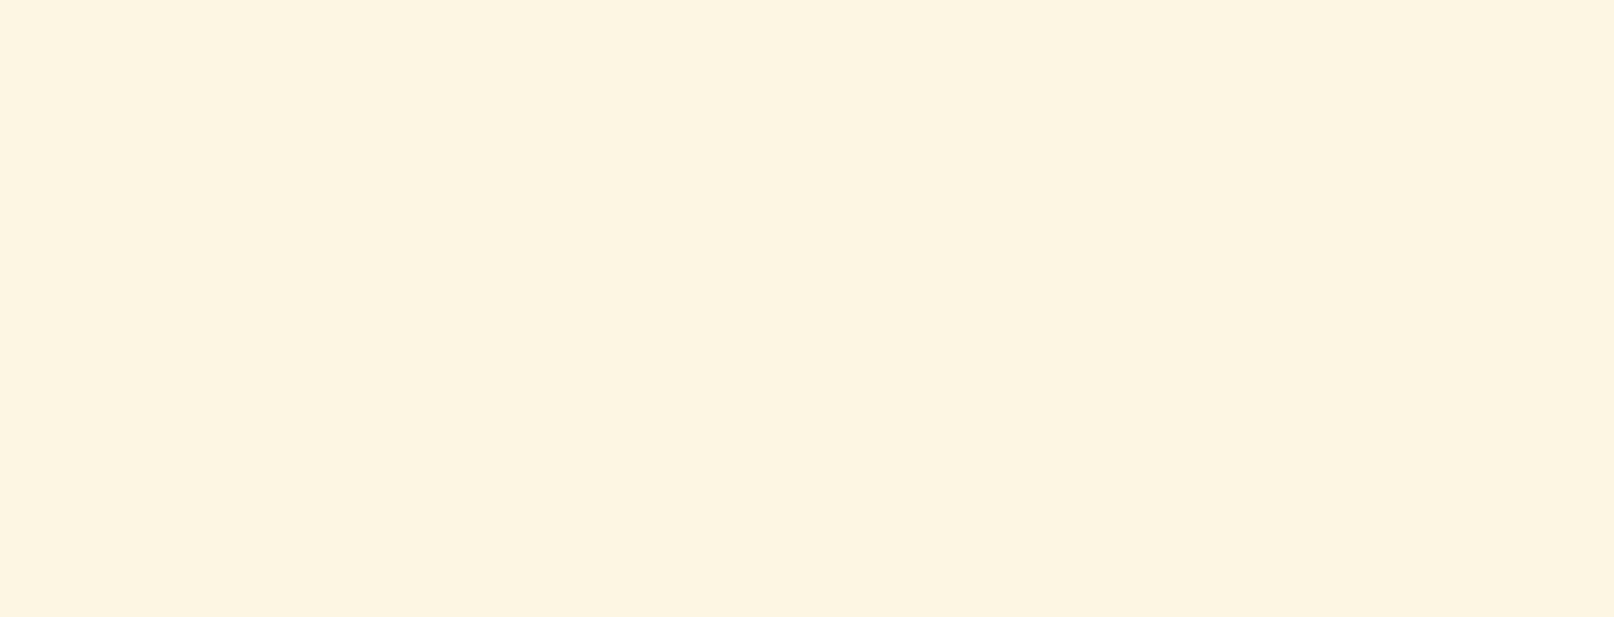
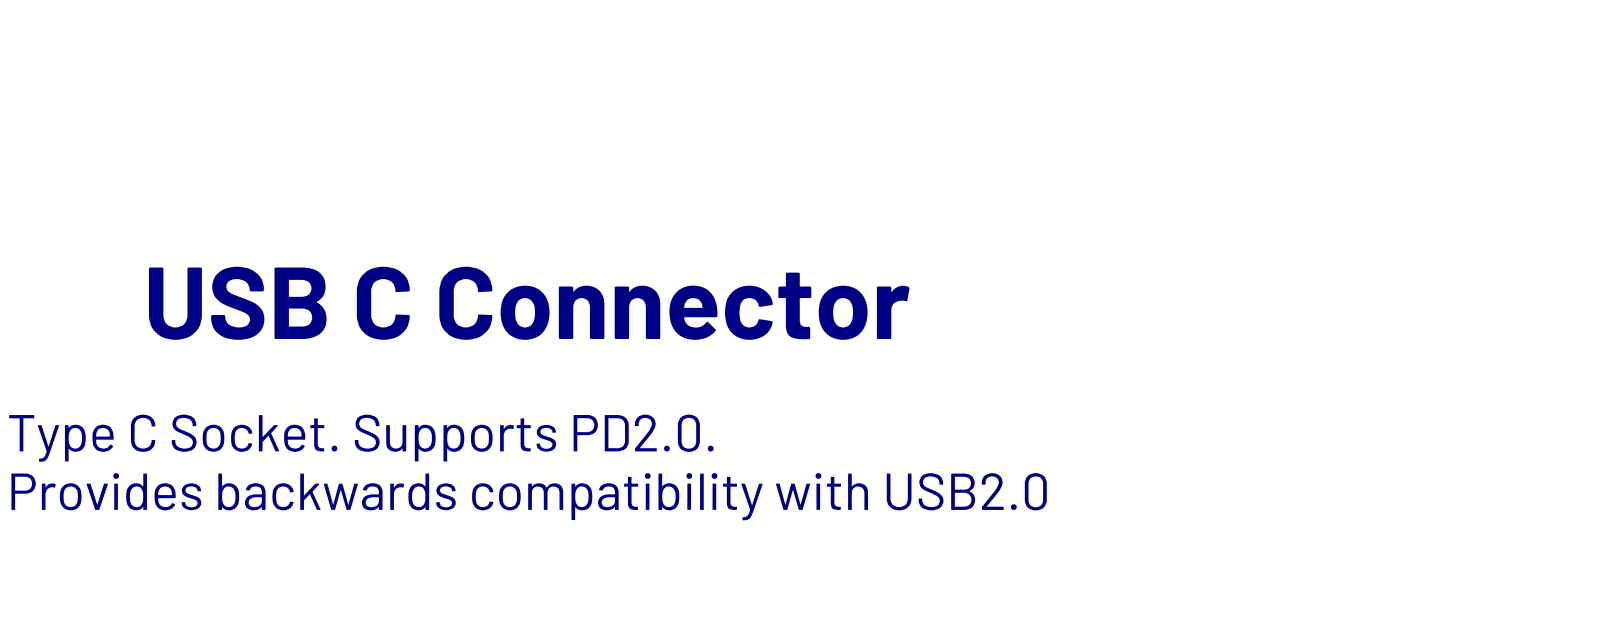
text: none -> USB C Connector (529, 303)
text: none -> Type C Socket. Supports PD2.0. (361, 438)
text: none -> Provides backwards compatibility with USB2.0 (529, 496)

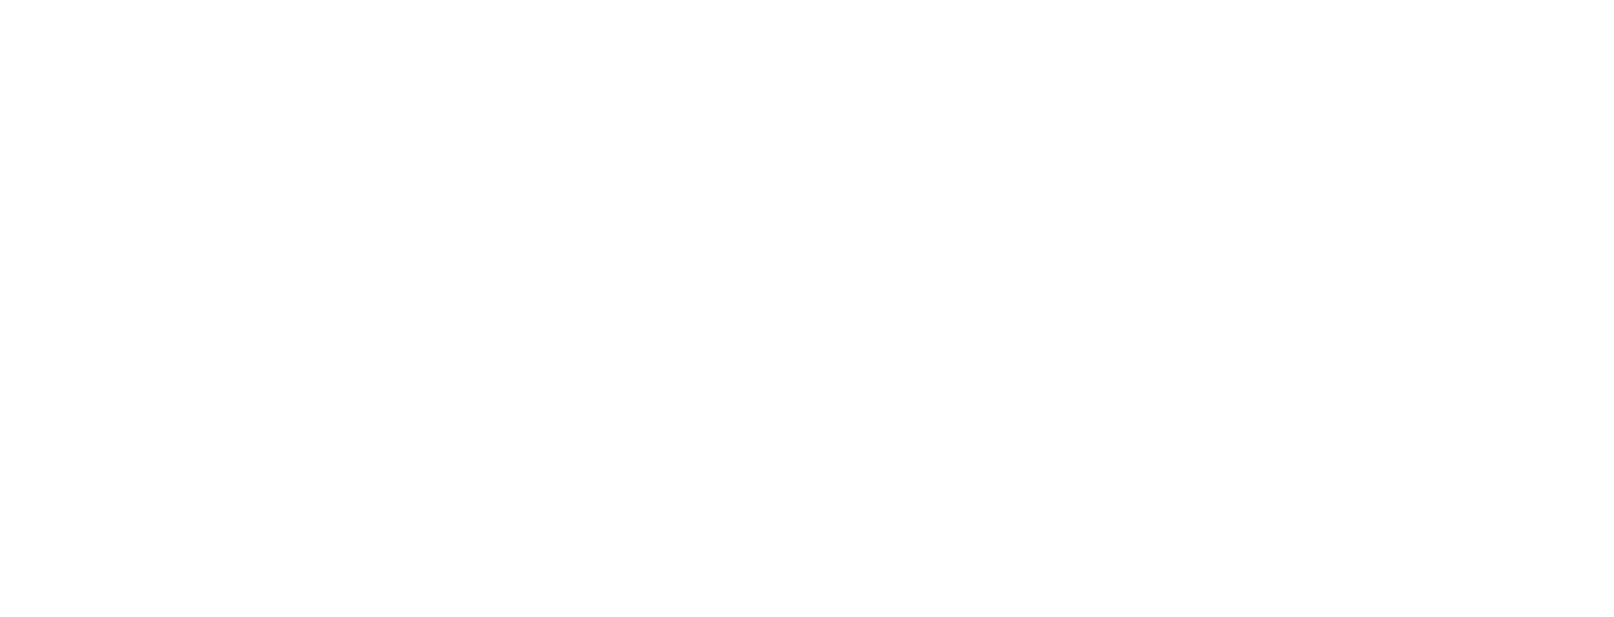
text: USB C Connector (529, 303) -> none
text: Type C Socket. Supports PD2.0. (361, 438) -> none
text: Provides backwards compatibility with USB2.0 (529, 496) -> none

